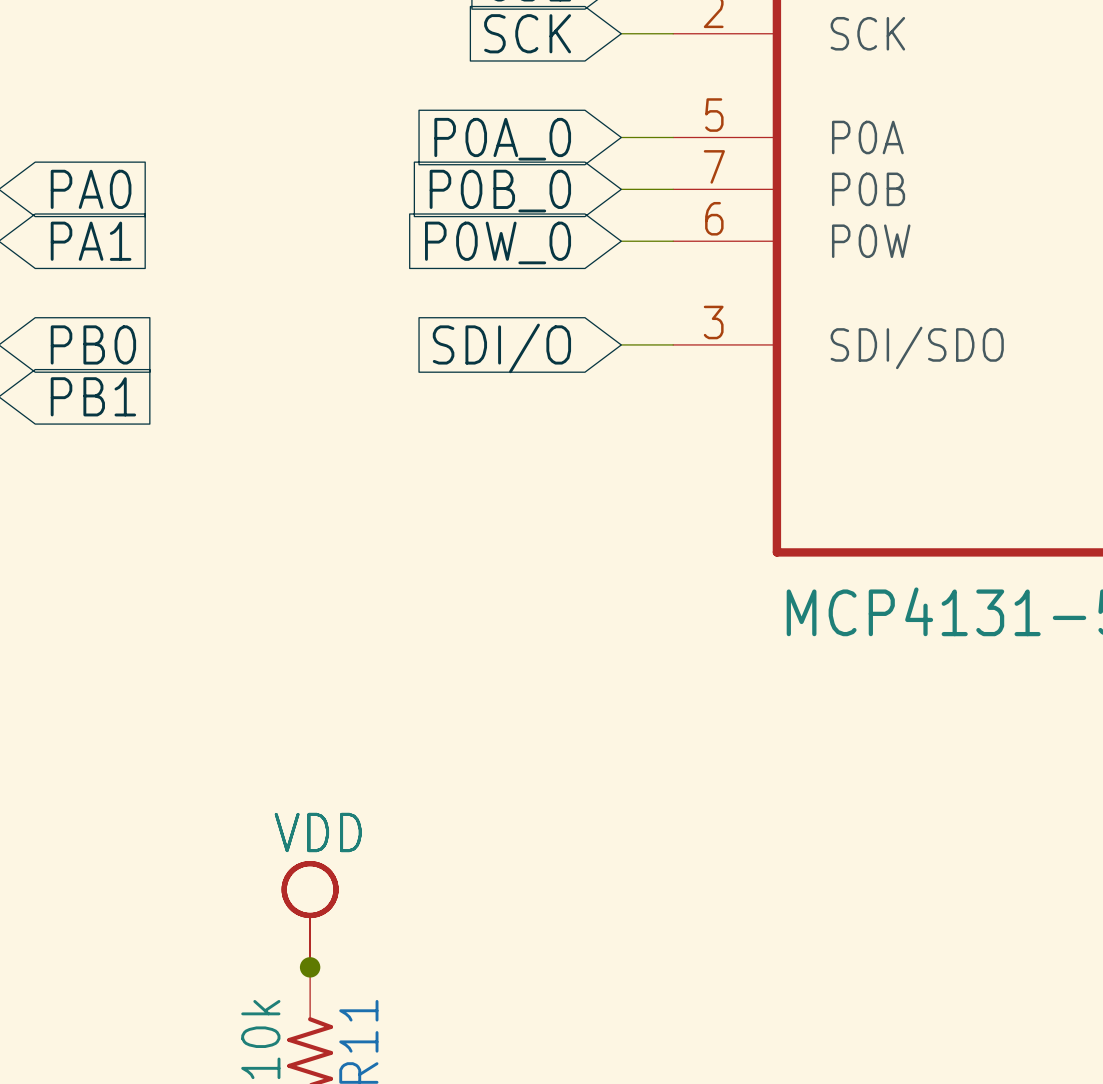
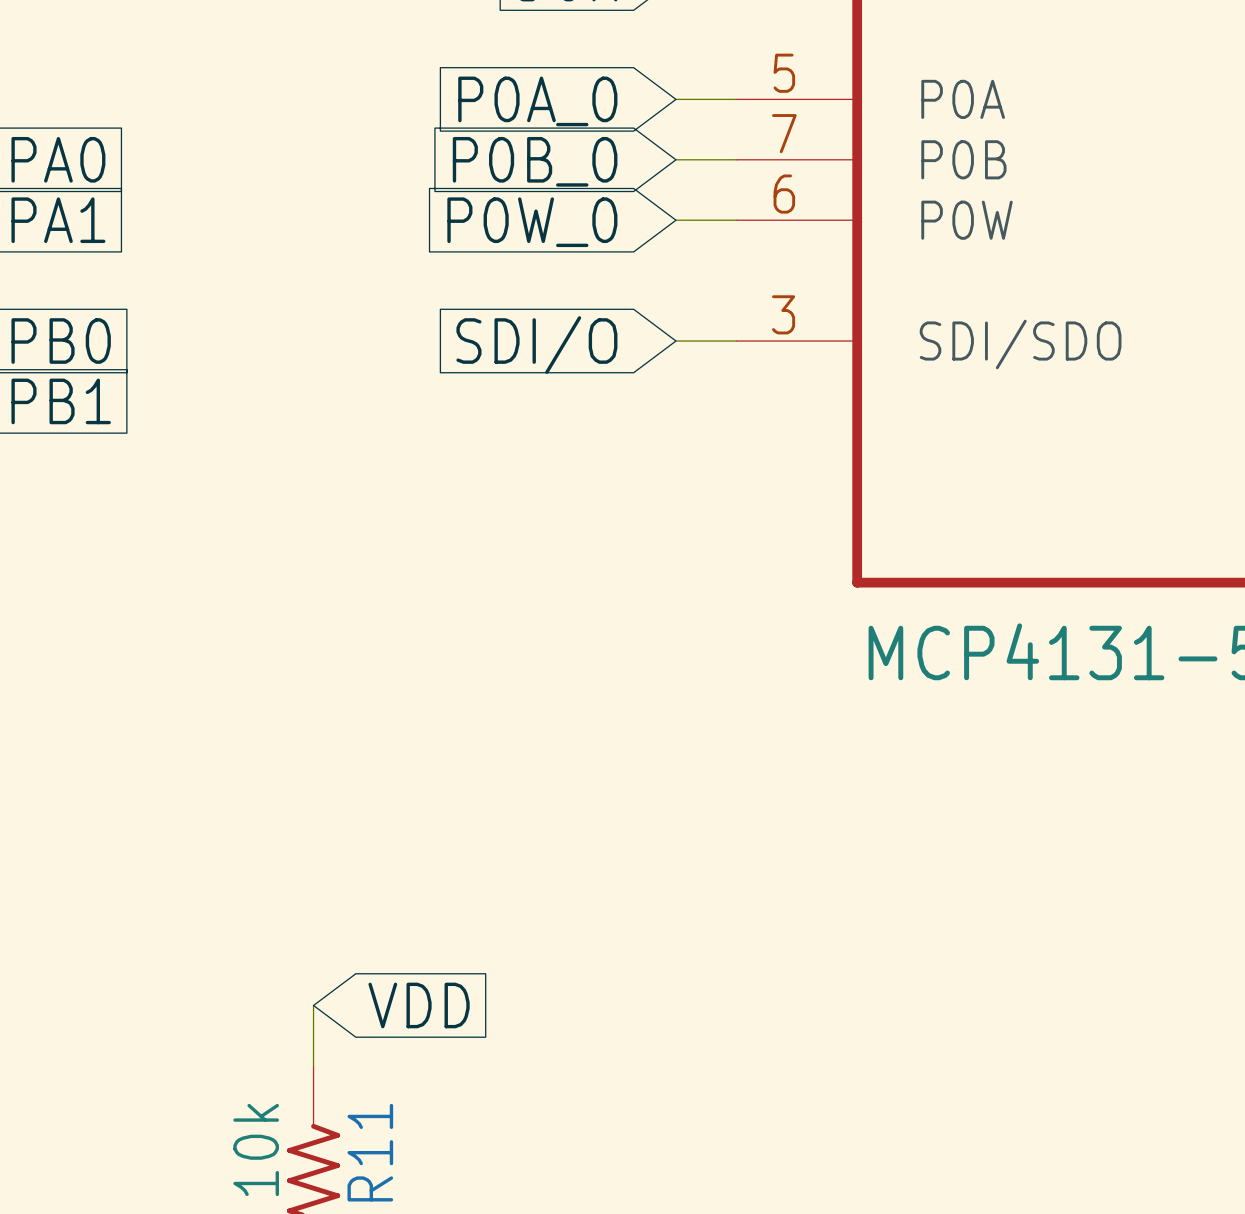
power symbol: VDD (310, 914) -> none
global label: none -> VDD (419, 1005)
junction: (310, 967) -> none

